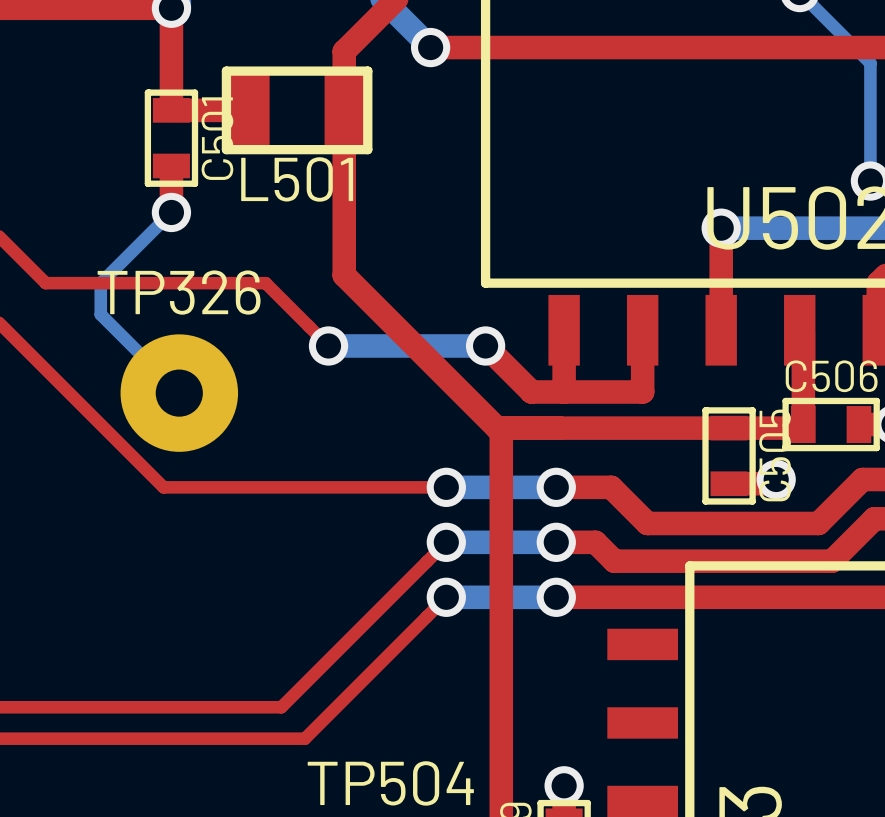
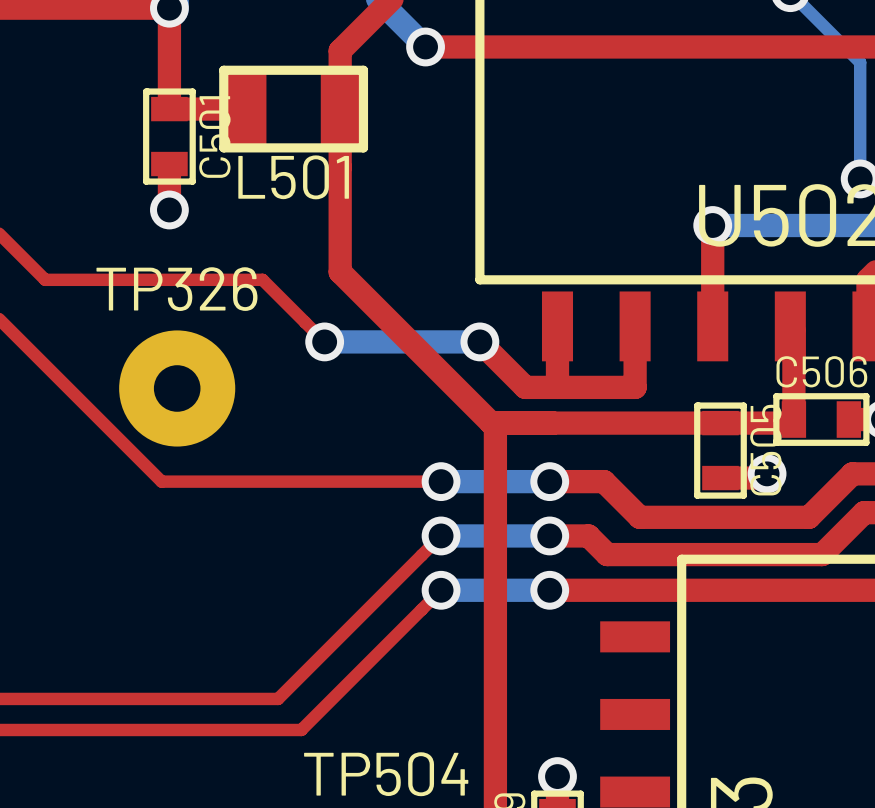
bottom track: (171, 212) (100, 283) (100, 314) (179, 393) -> none

